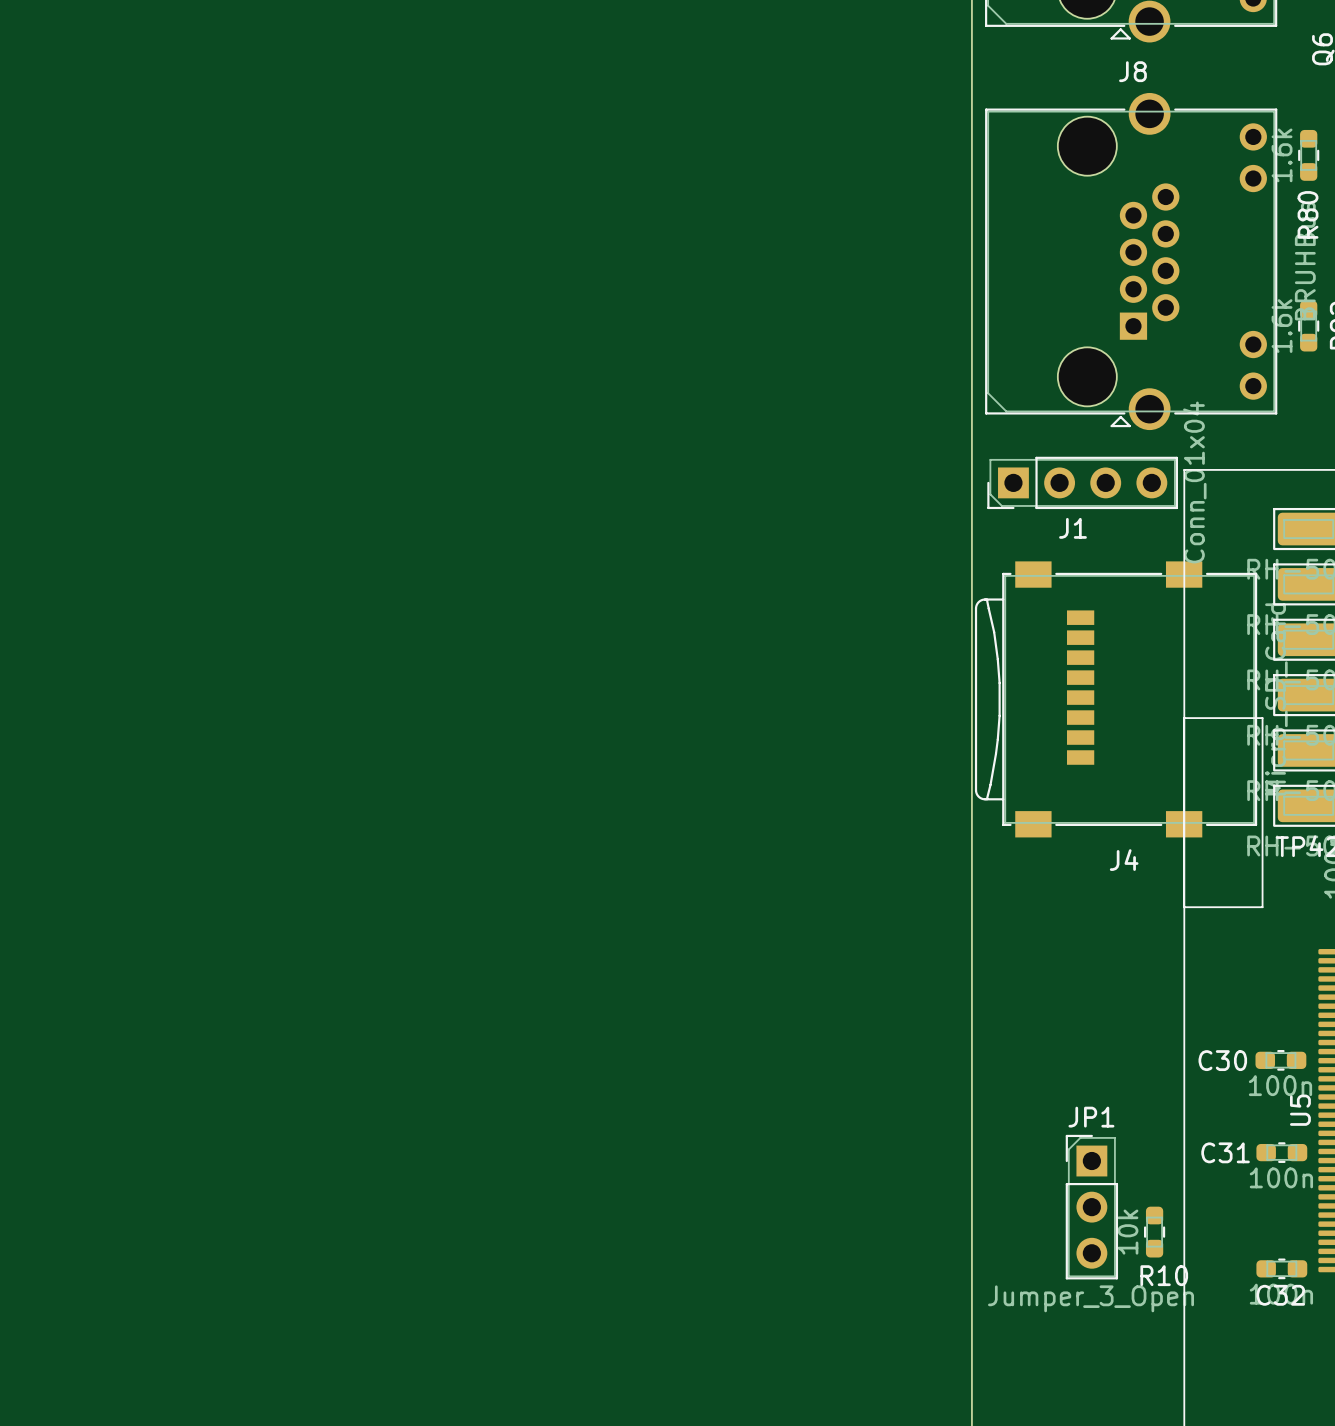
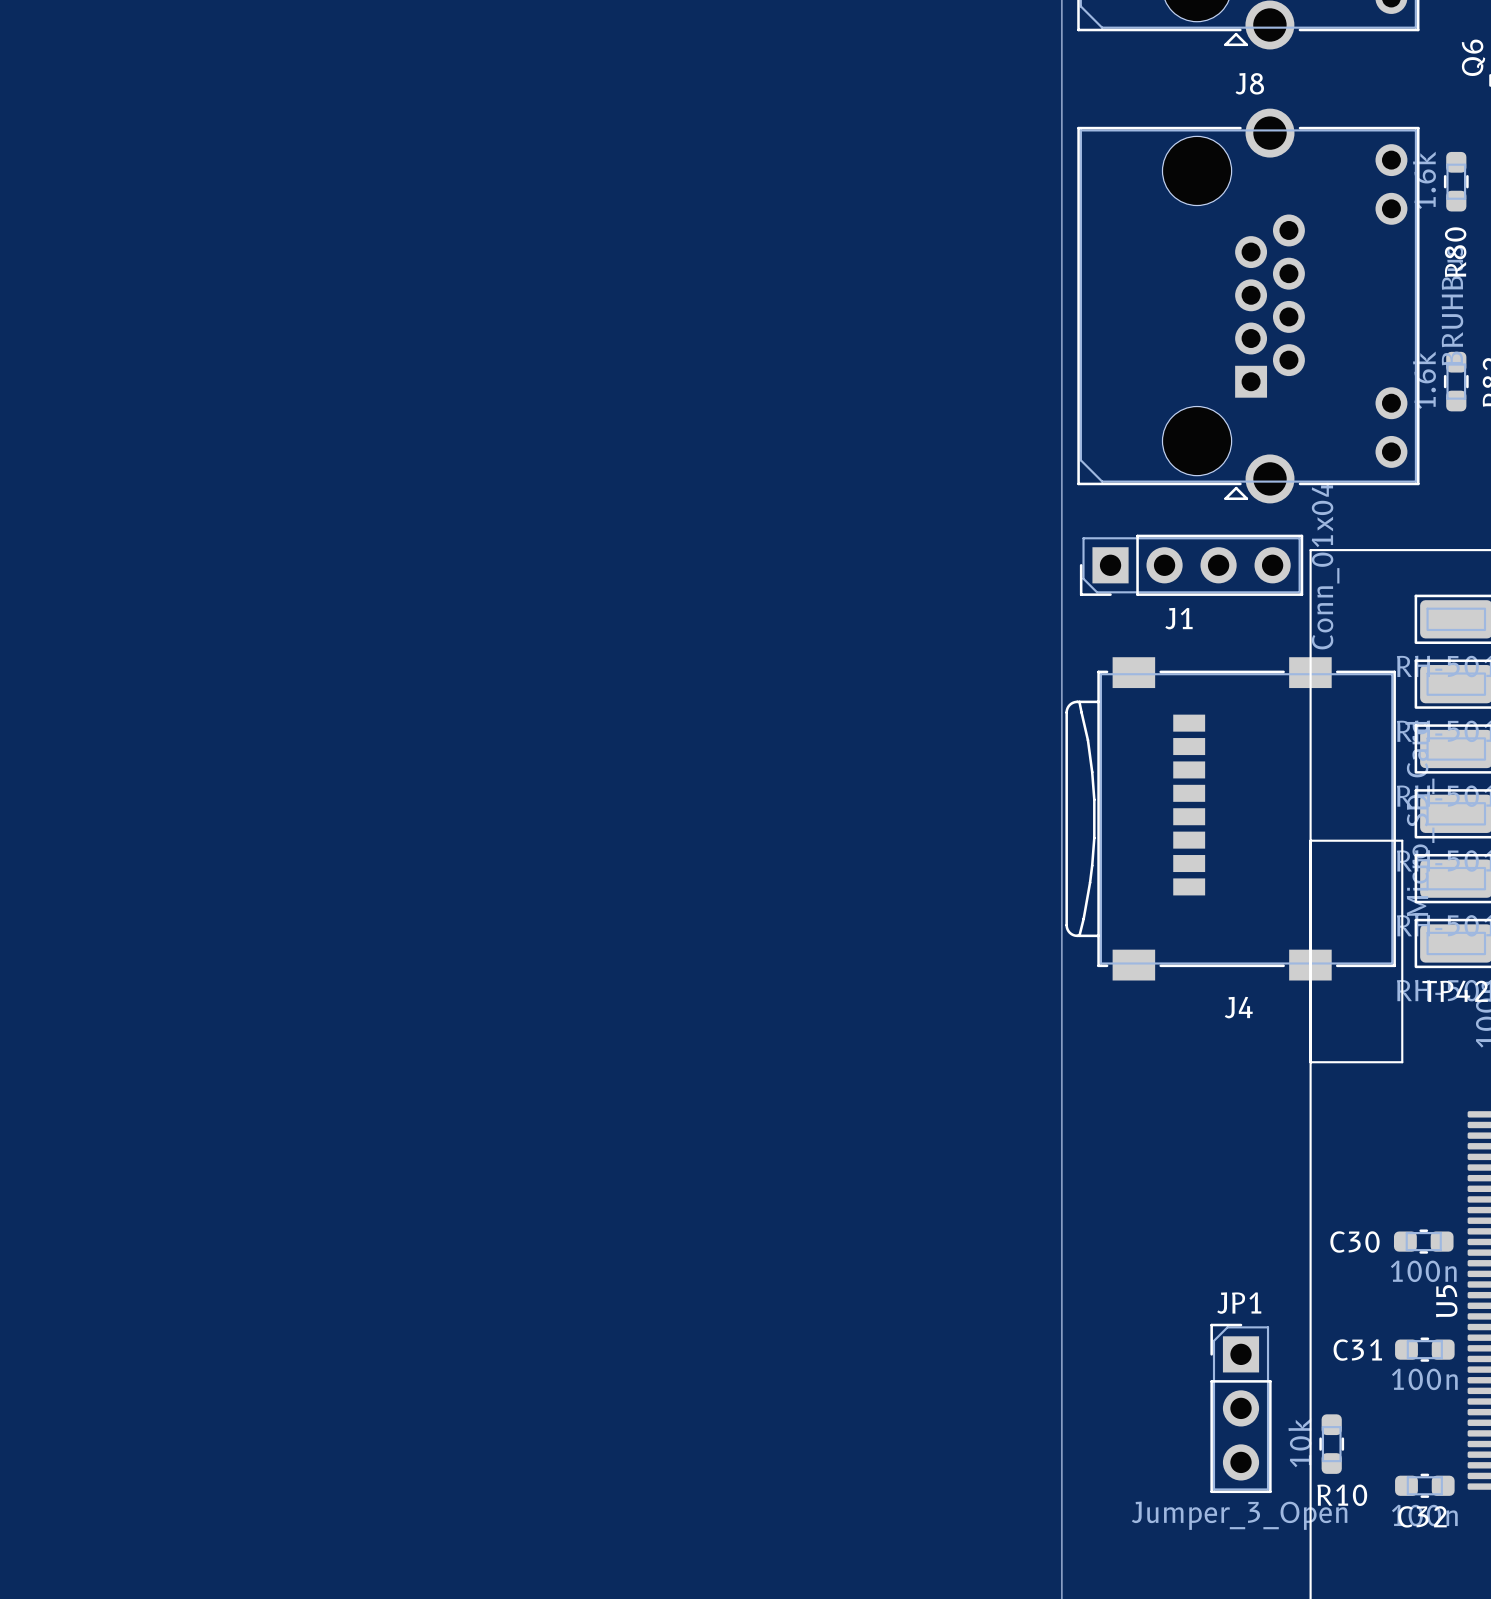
JP1 position: (1091, 1207) -> (1241, 1408)
R10 position: (1154, 1232) -> (1331, 1444)

